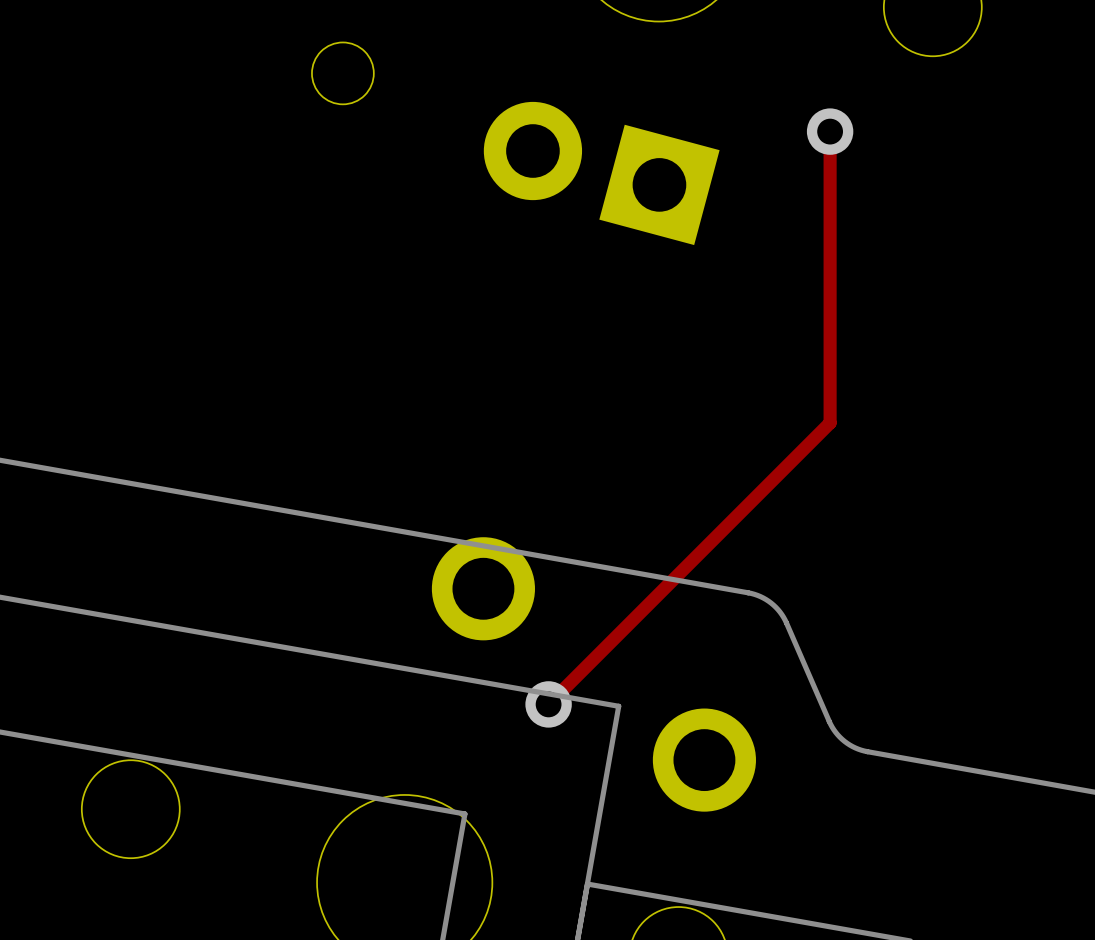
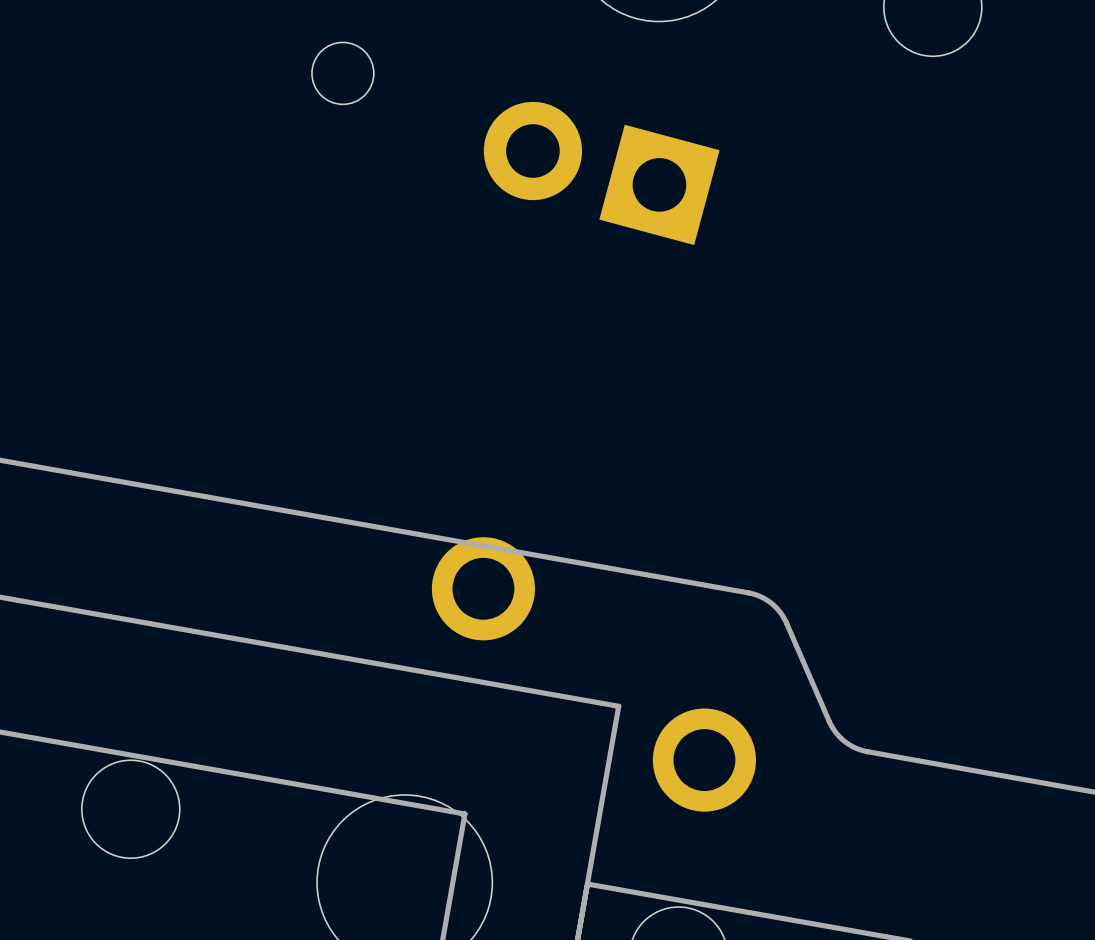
track: (830, 131) (830, 422) (548, 704) -> none
via: (830, 131) -> none
via: (548, 704) -> none

